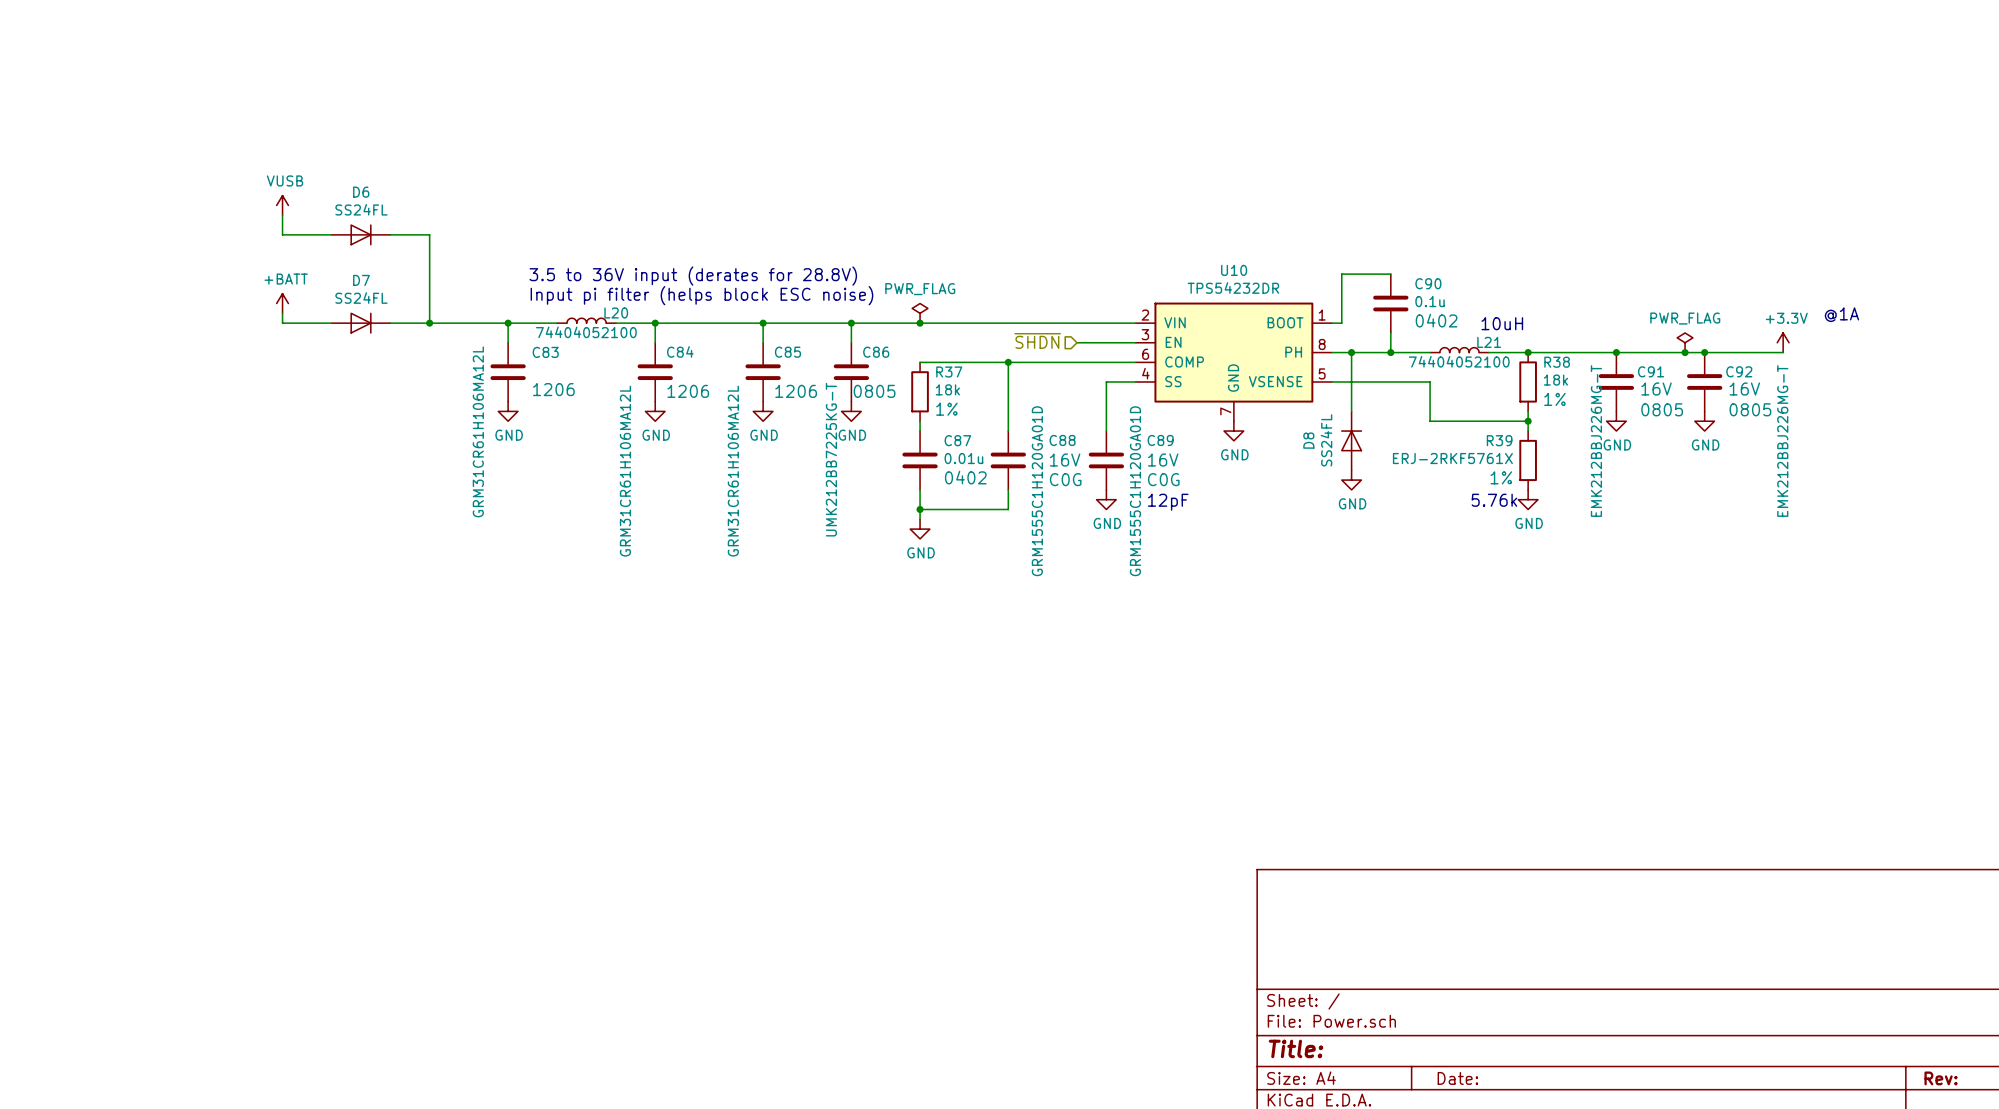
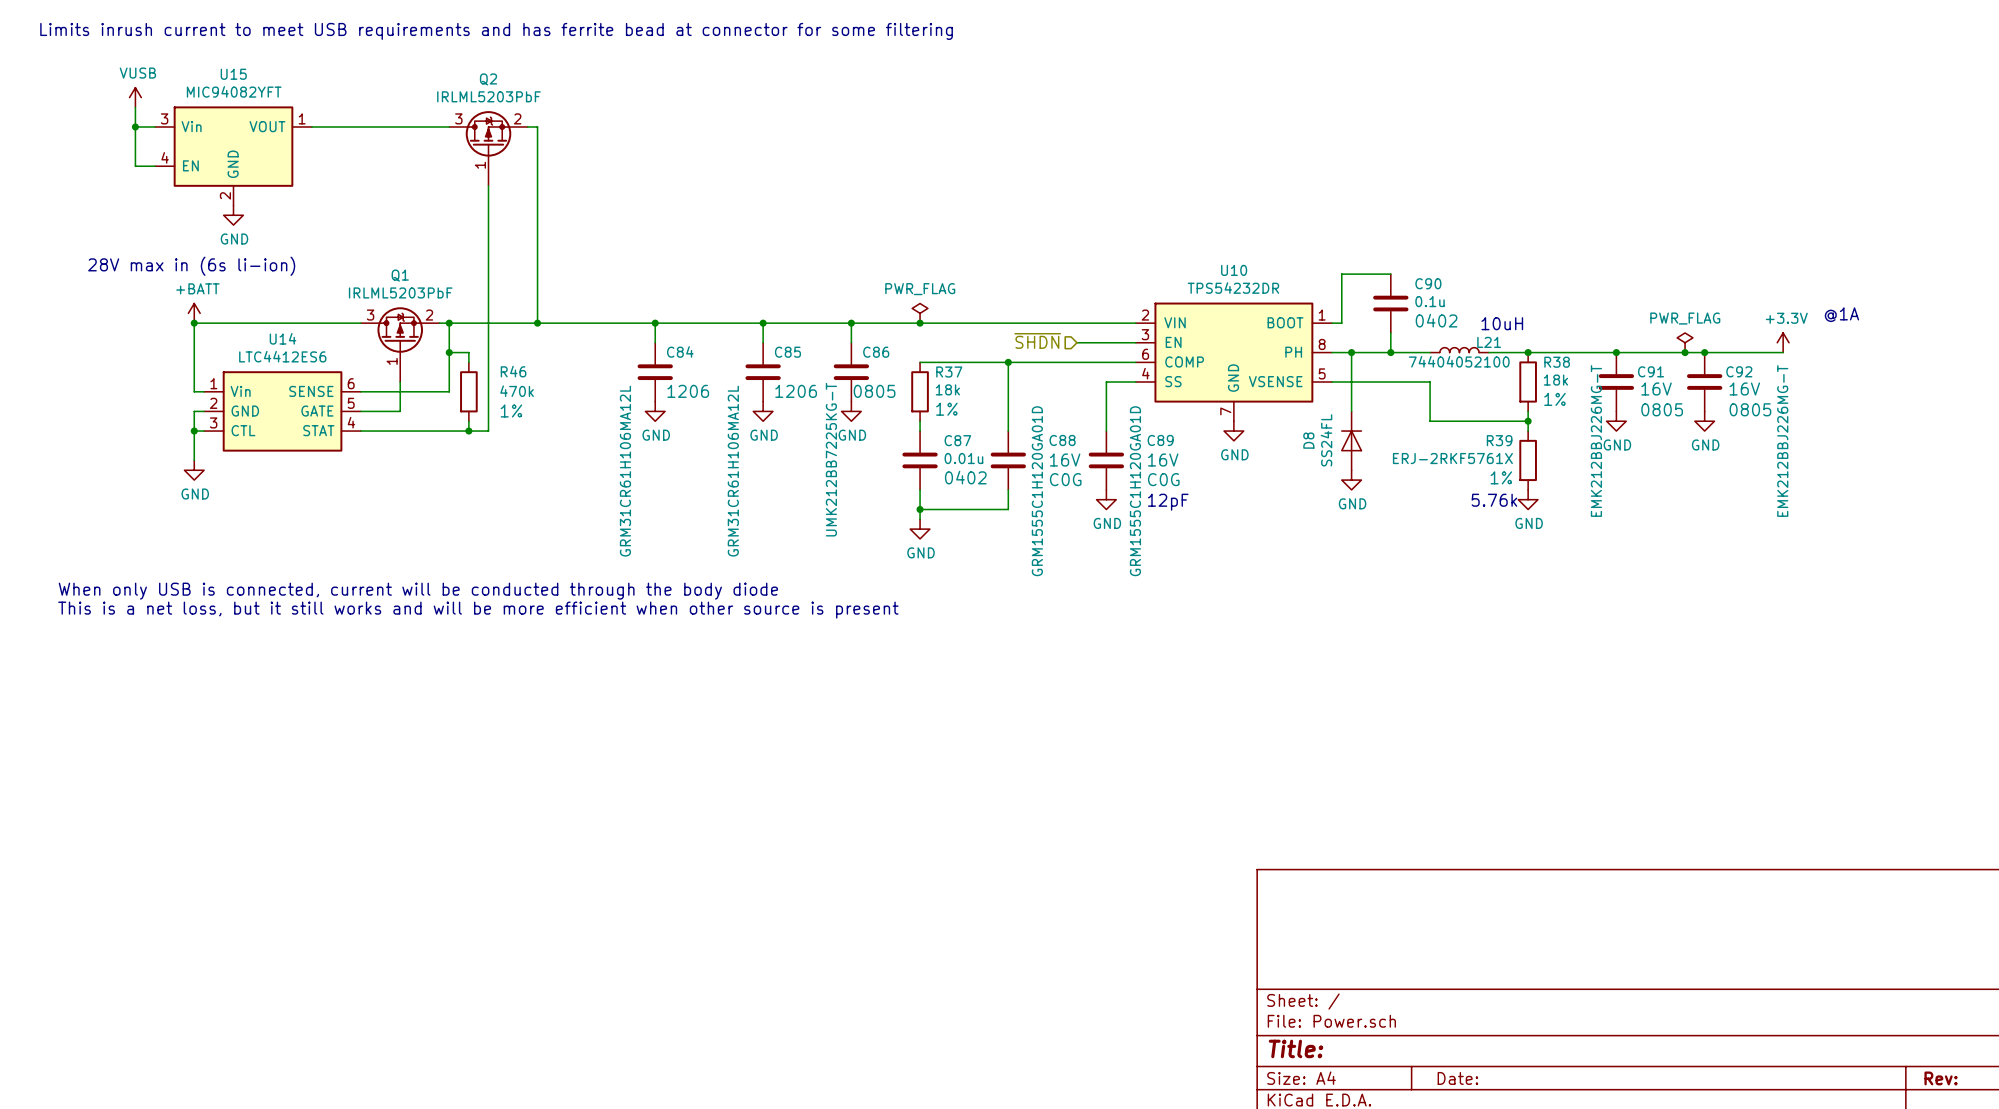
text: none -> Limits inrush current to meet USB requirements and has ferrite bead at connector for some filtering (496, 31)
wire: none -> (135, 107) (135, 166) (155, 166)
wire: none -> (135, 126) (155, 126)
junction: none -> (135, 126)
wire: none -> (311, 126) (449, 126)
wire: none -> (527, 126) (537, 126) (537, 323)
Q2: none -> IRLML5203PbF (488, 148)
U15: none -> MIC94082YFT (233, 155)
wire: none -> (488, 185) (488, 431) (361, 431)
power symbol position: VUSB (282, 205) -> VUSB (135, 97)
power symbol: none -> GND (233, 215)
wire: (282, 215) (282, 234) (331, 234) -> none
D6: SS24FL (361, 234) -> none
wire: (390, 234) (429, 234) (429, 323) -> none
text: none -> 28V max in (6s li-ion) (191, 266)
text: 3.5 to 36V input (derates for 28.8V) (693, 276) -> none
text: Input pi filter (helps block ESC noise) (701, 295) -> none
power symbol position: +BATT (282, 303) -> +BATT (194, 313)
wire: (282, 313) (282, 323) -> (204, 391) (194, 391) (194, 323) (282, 323)
L20: 74404052100 (586, 320) -> none
junction: none -> (194, 323)
D7: SS24FL (361, 323) -> none
junction: (429, 323) -> none
wire: none -> (449, 323) (449, 391) (361, 391)
junction: none -> (449, 323)
wire: (508, 323) (508, 342) -> none
junction: (508, 323) -> none
junction: none -> (537, 323)
wire: none -> (557, 323) (616, 323)
Q1: none -> IRLML5203PbF (400, 344)
wire: none -> (449, 352) (468, 352) (468, 362)
junction: none -> (449, 352)
C83: GRM31CR61H106MA12L (508, 372) -> none
wire: none -> (400, 381) (400, 411) (361, 411)
R46: none -> 470k (468, 391)
wire: none -> (204, 411) (194, 411) (194, 460)
U14: none -> LTC4412ES6 (282, 411)
power symbol: GND (508, 411) -> none
wire: none -> (468, 421) (468, 431)
wire: none -> (194, 431) (204, 431)
junction: none -> (194, 431)
junction: none -> (468, 431)
power symbol: none -> GND (194, 470)
text: none -> When only USB is connected, current will be conducted through the body diode (418, 591)
text: none -> This is a net loss, but it still works and will be more efficient when other source is present (478, 610)

